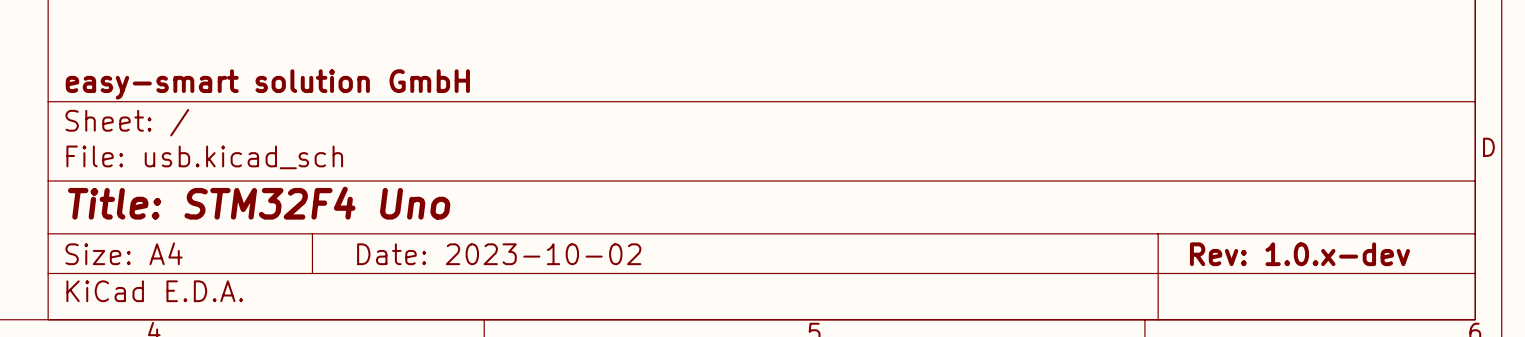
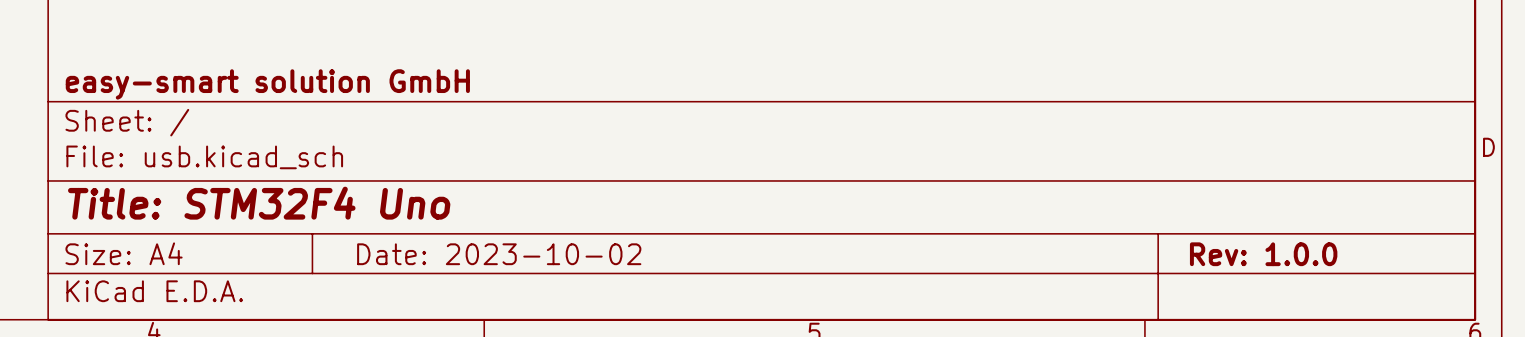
title block: Rev: 1.0.x-dev (1299, 254) -> Rev: 1.0.0 (1263, 254)

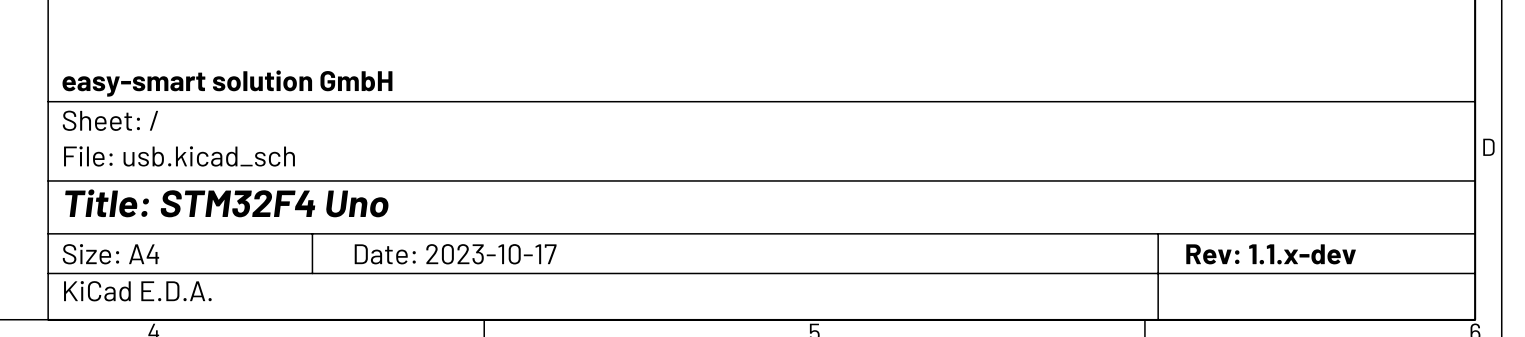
title block: Date: 2023-10-02 (499, 254) -> Date: 2023-10-17 (455, 254)
title block: Rev: 1.0.0 (1263, 254) -> Rev: 1.1.x-dev (1271, 254)

